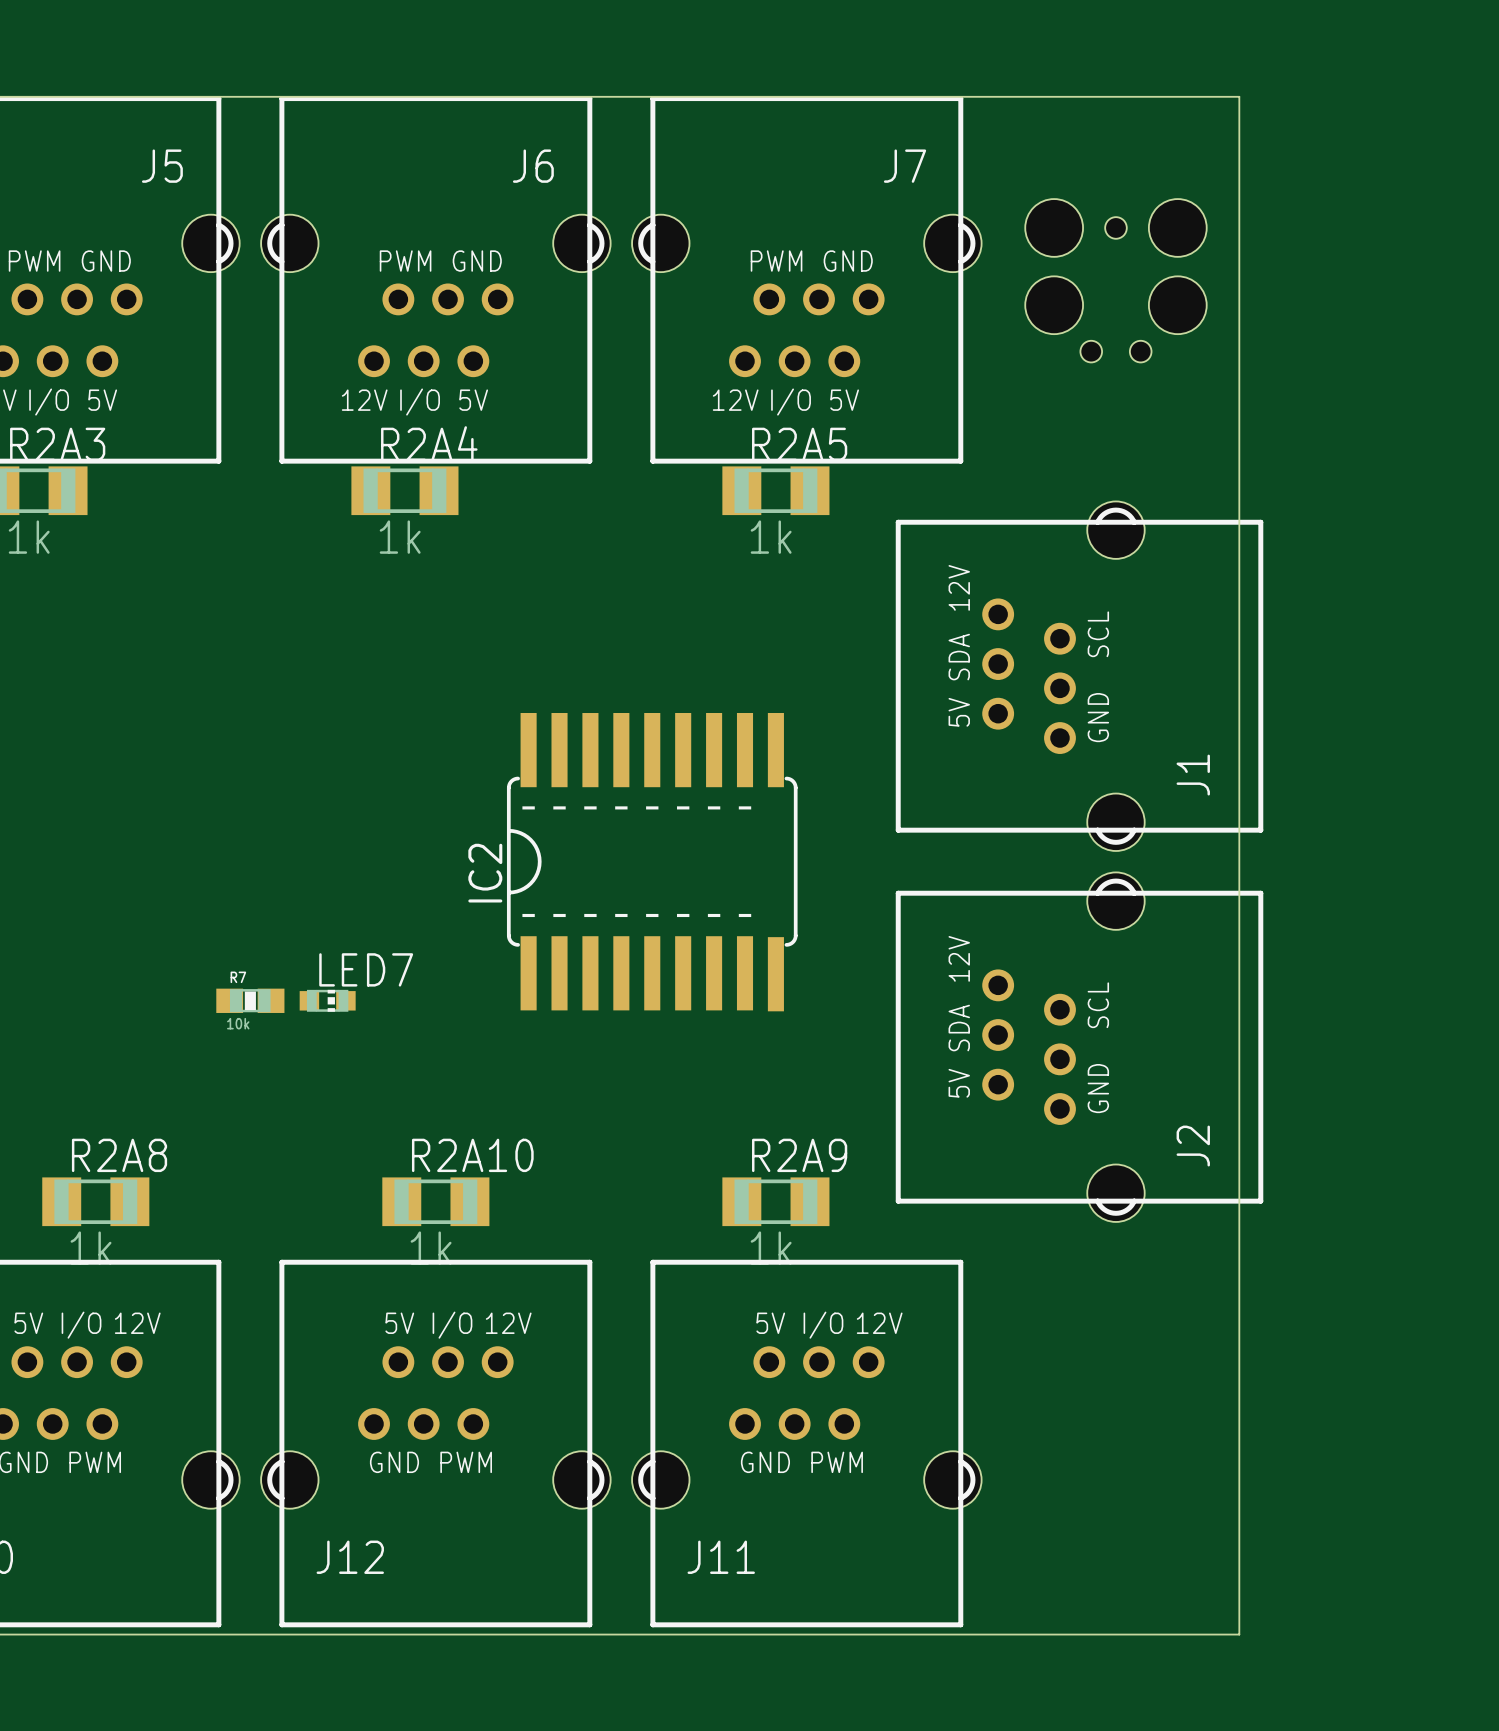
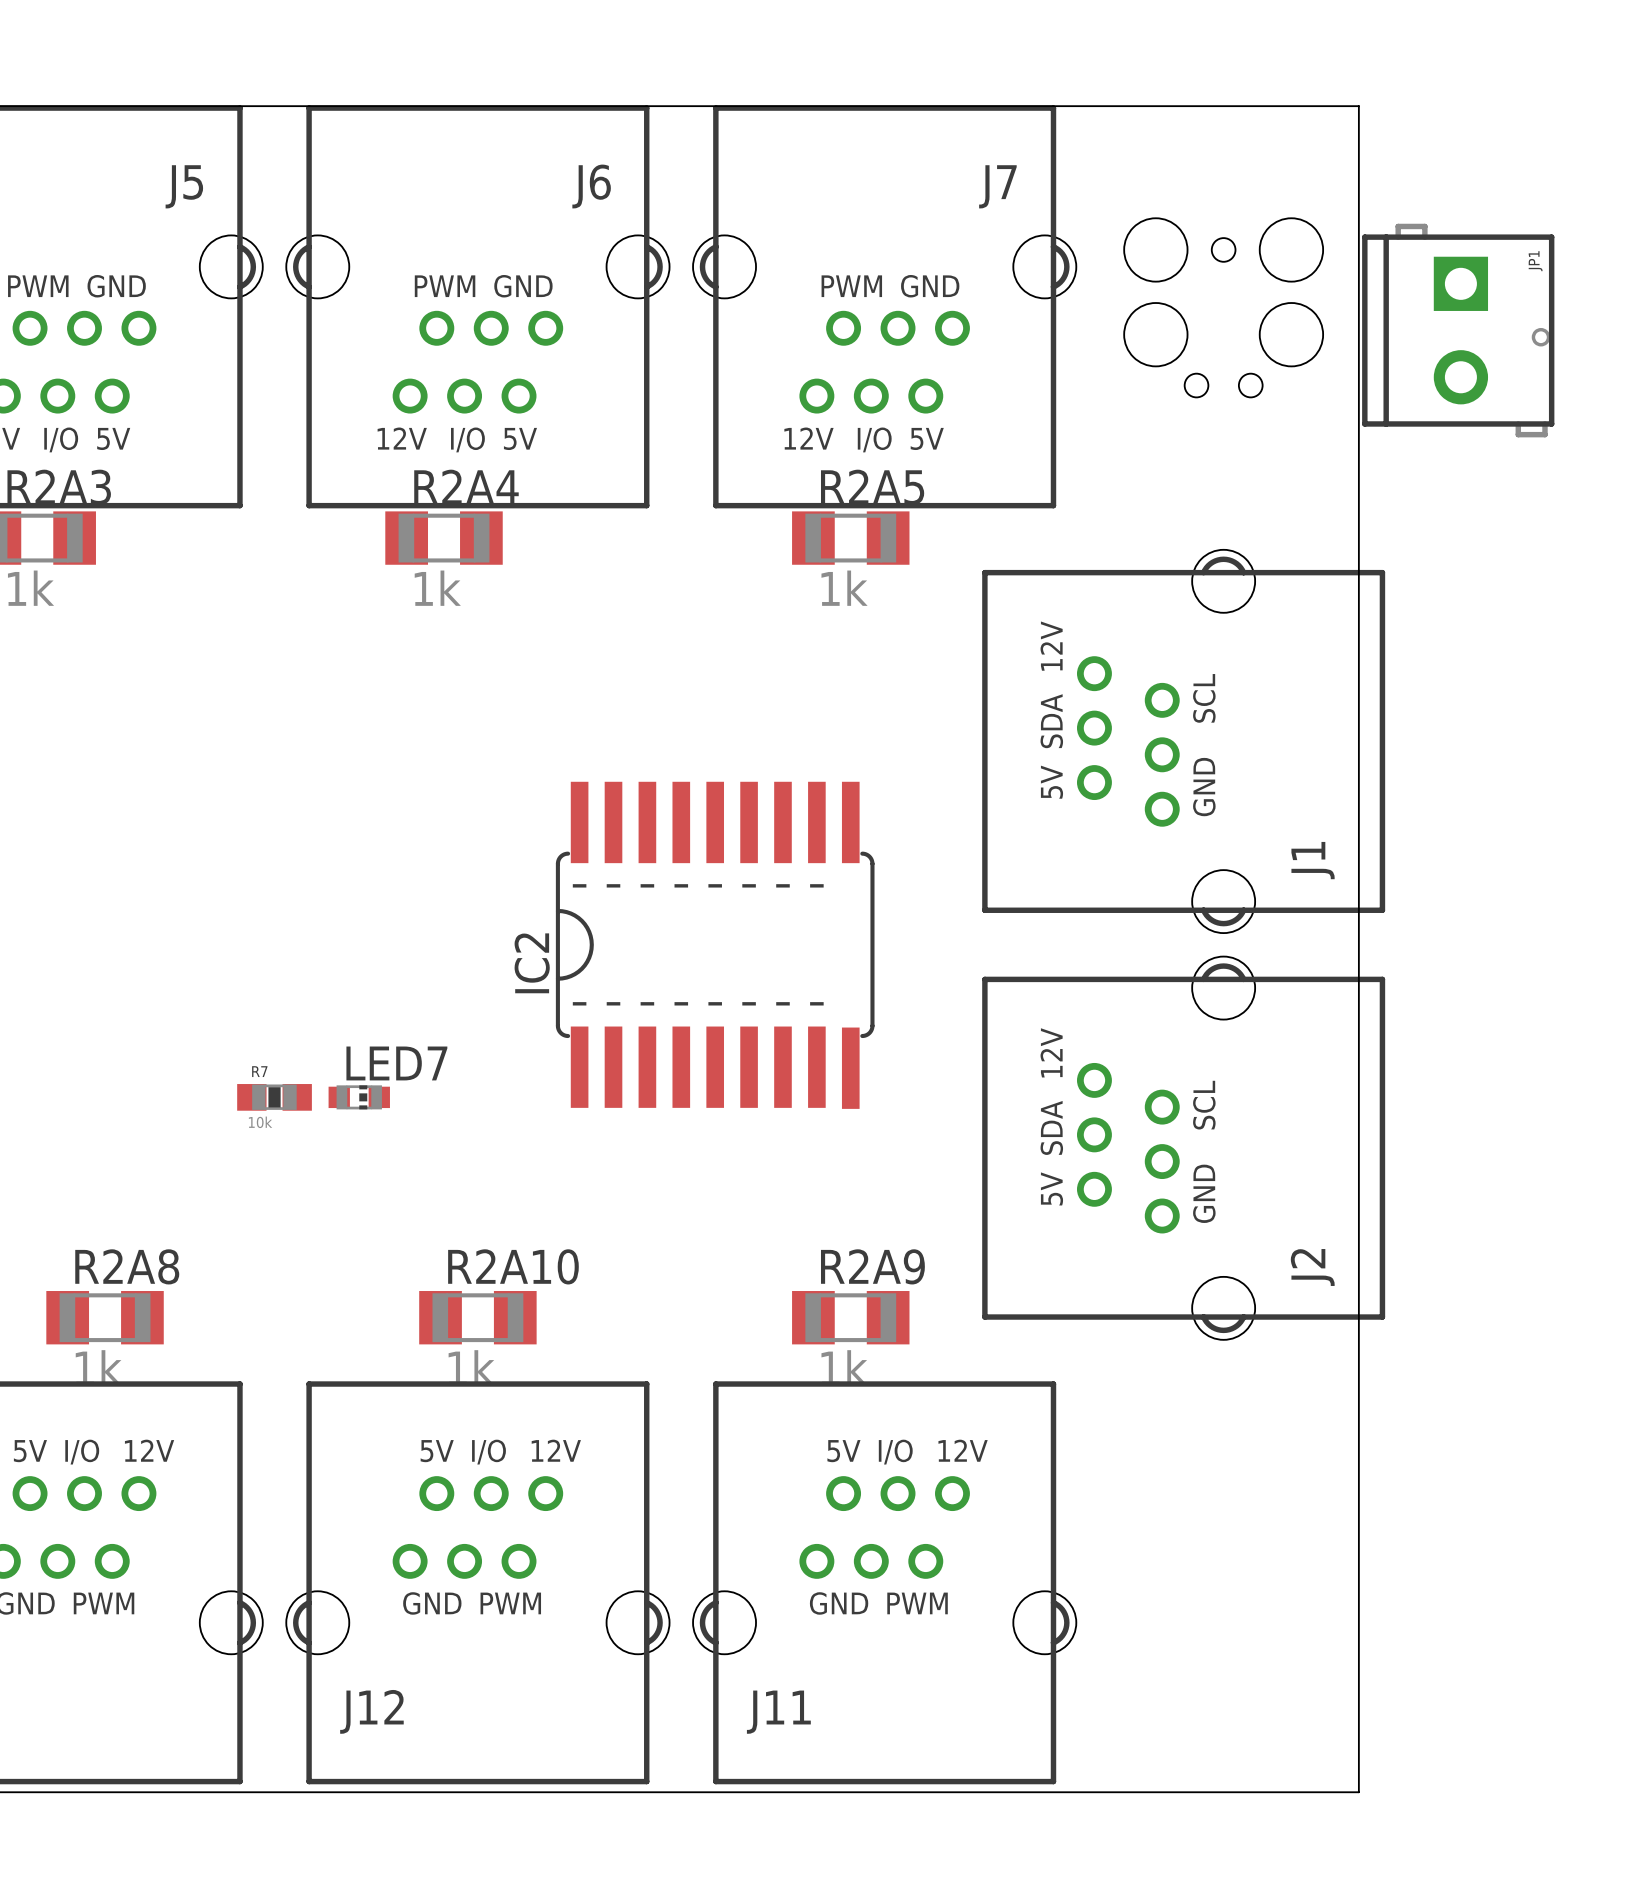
JP1: none -> (1458, 330)

